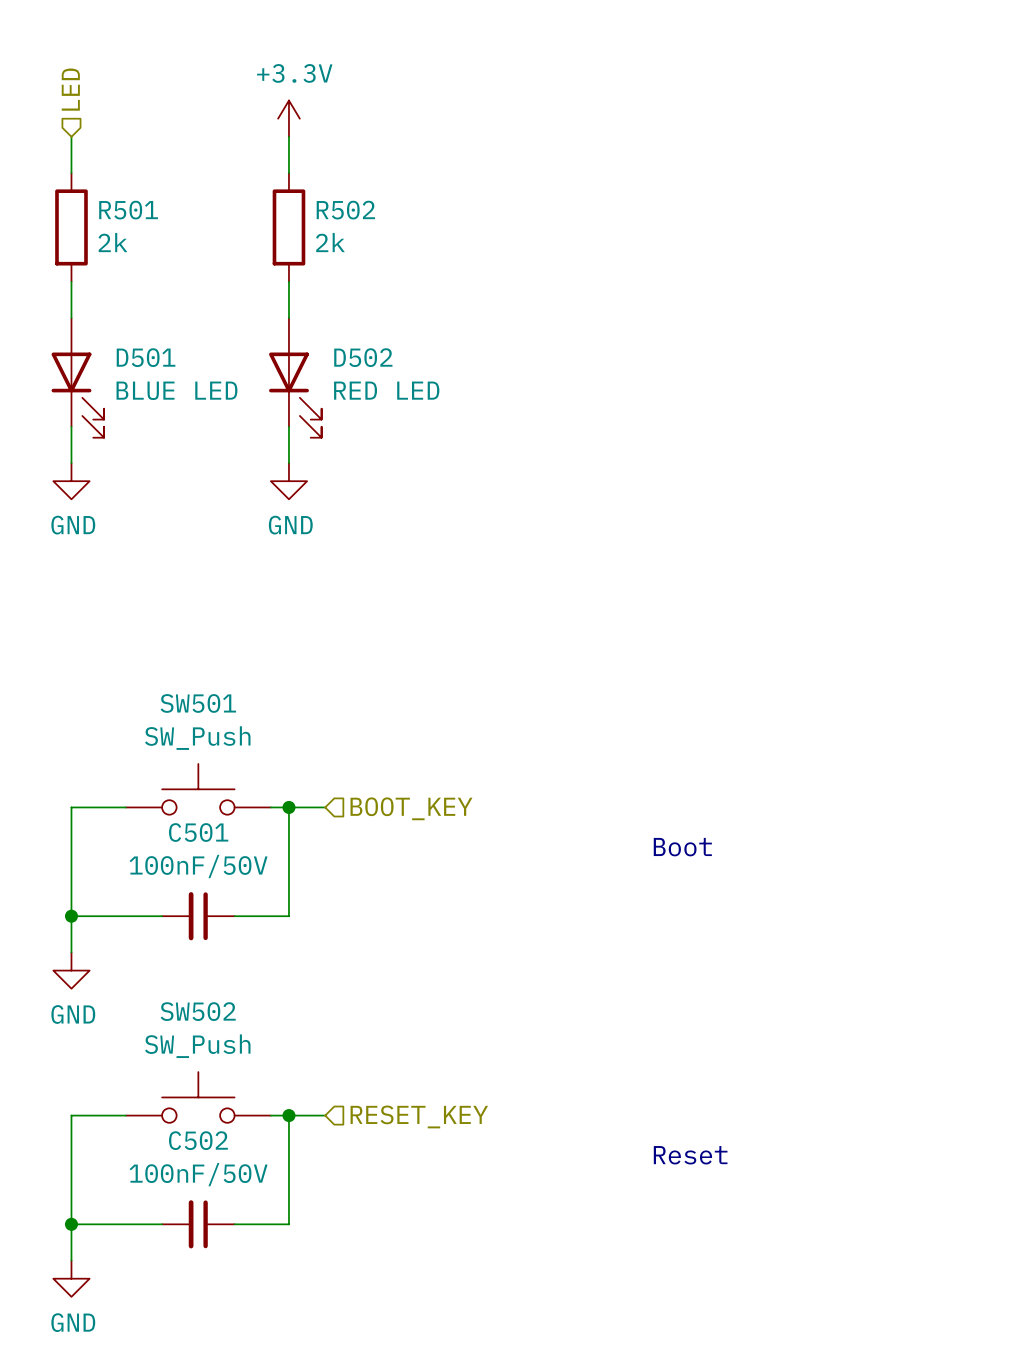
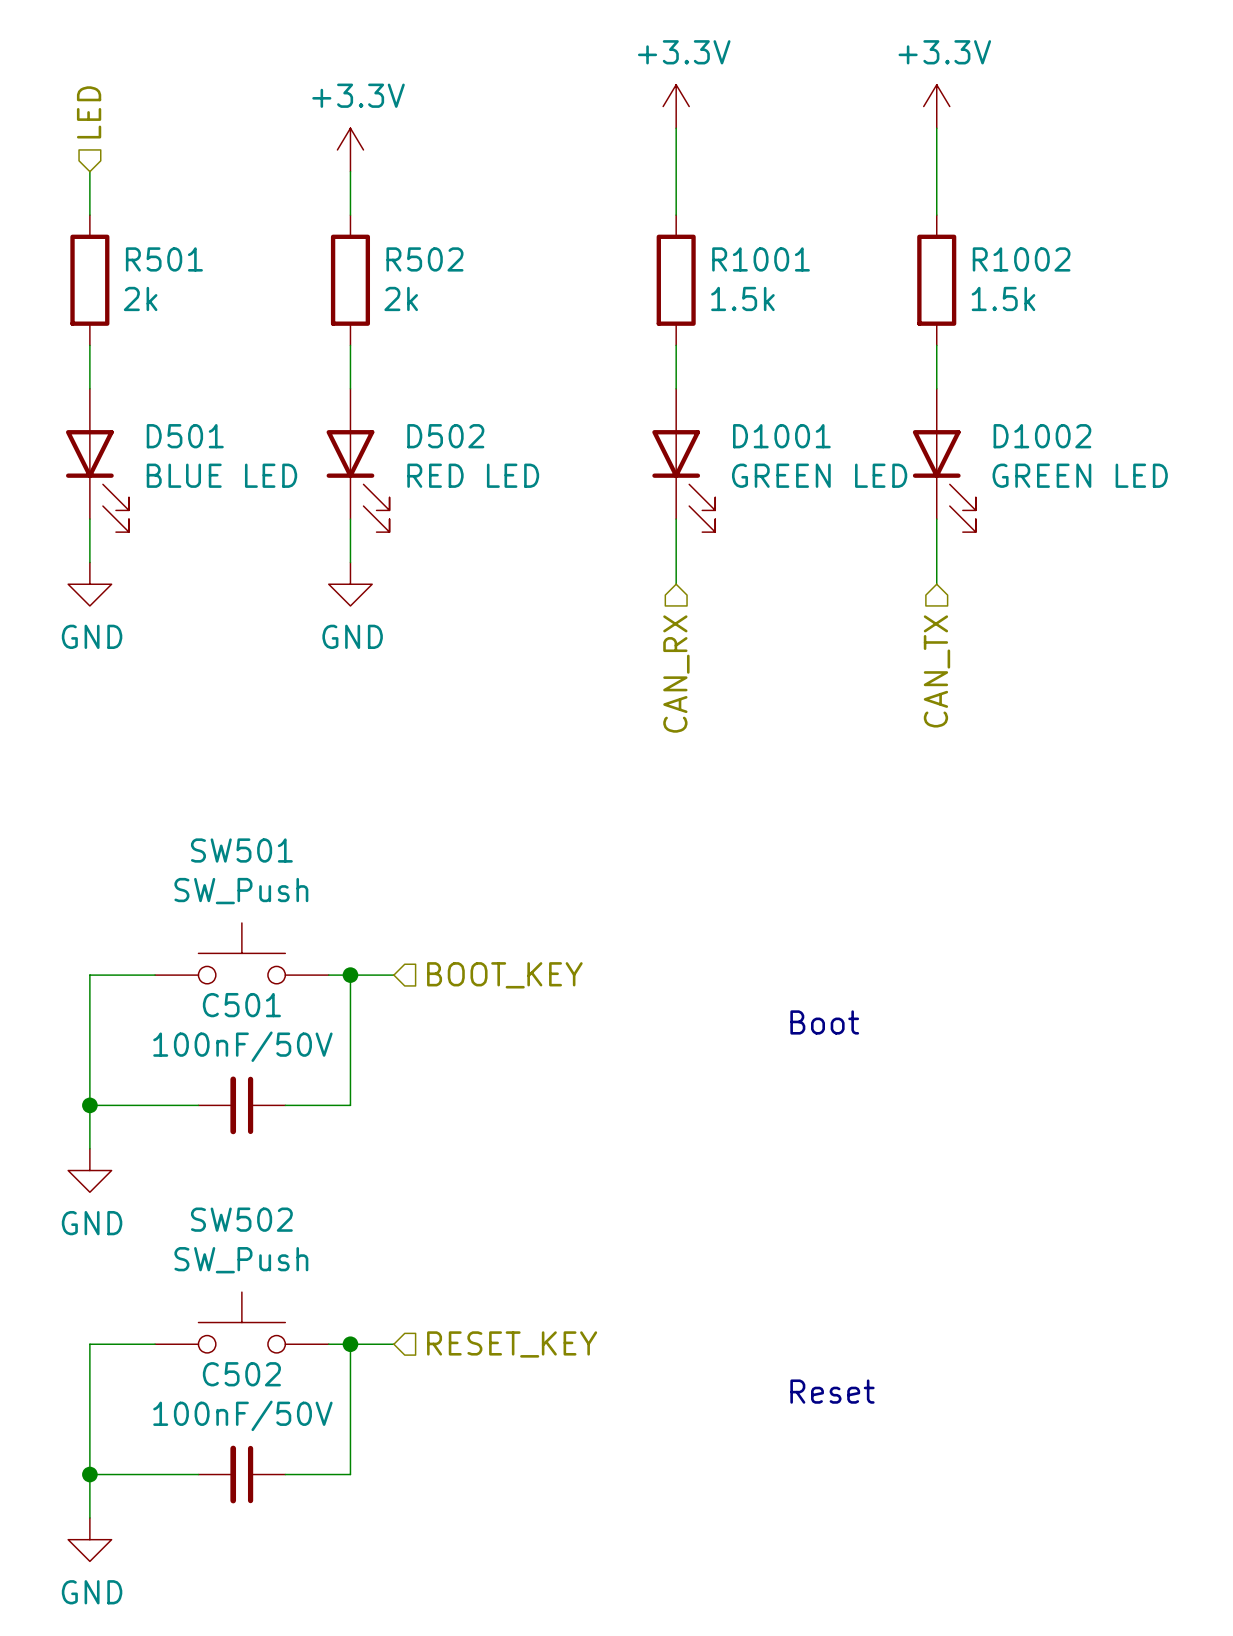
power symbol: none -> +3.3V (676, 106)
power symbol: none -> +3.3V (936, 106)
wire: none -> (676, 128) (676, 215)
wire: none -> (936, 128) (936, 215)
R1001: none -> 1.5k (676, 280)
R1002: none -> 1.5k (936, 280)
wire: none -> (676, 345) (676, 388)
wire: none -> (936, 345) (936, 388)
D1001: none -> GREEN LED (683, 460)
D1002: none -> GREEN LED (944, 460)
wire: none -> (676, 519) (676, 584)
wire: none -> (936, 519) (936, 584)
hierarchical label: none -> CAN_RX (676, 674)
hierarchical label: none -> CAN_TX (936, 671)

